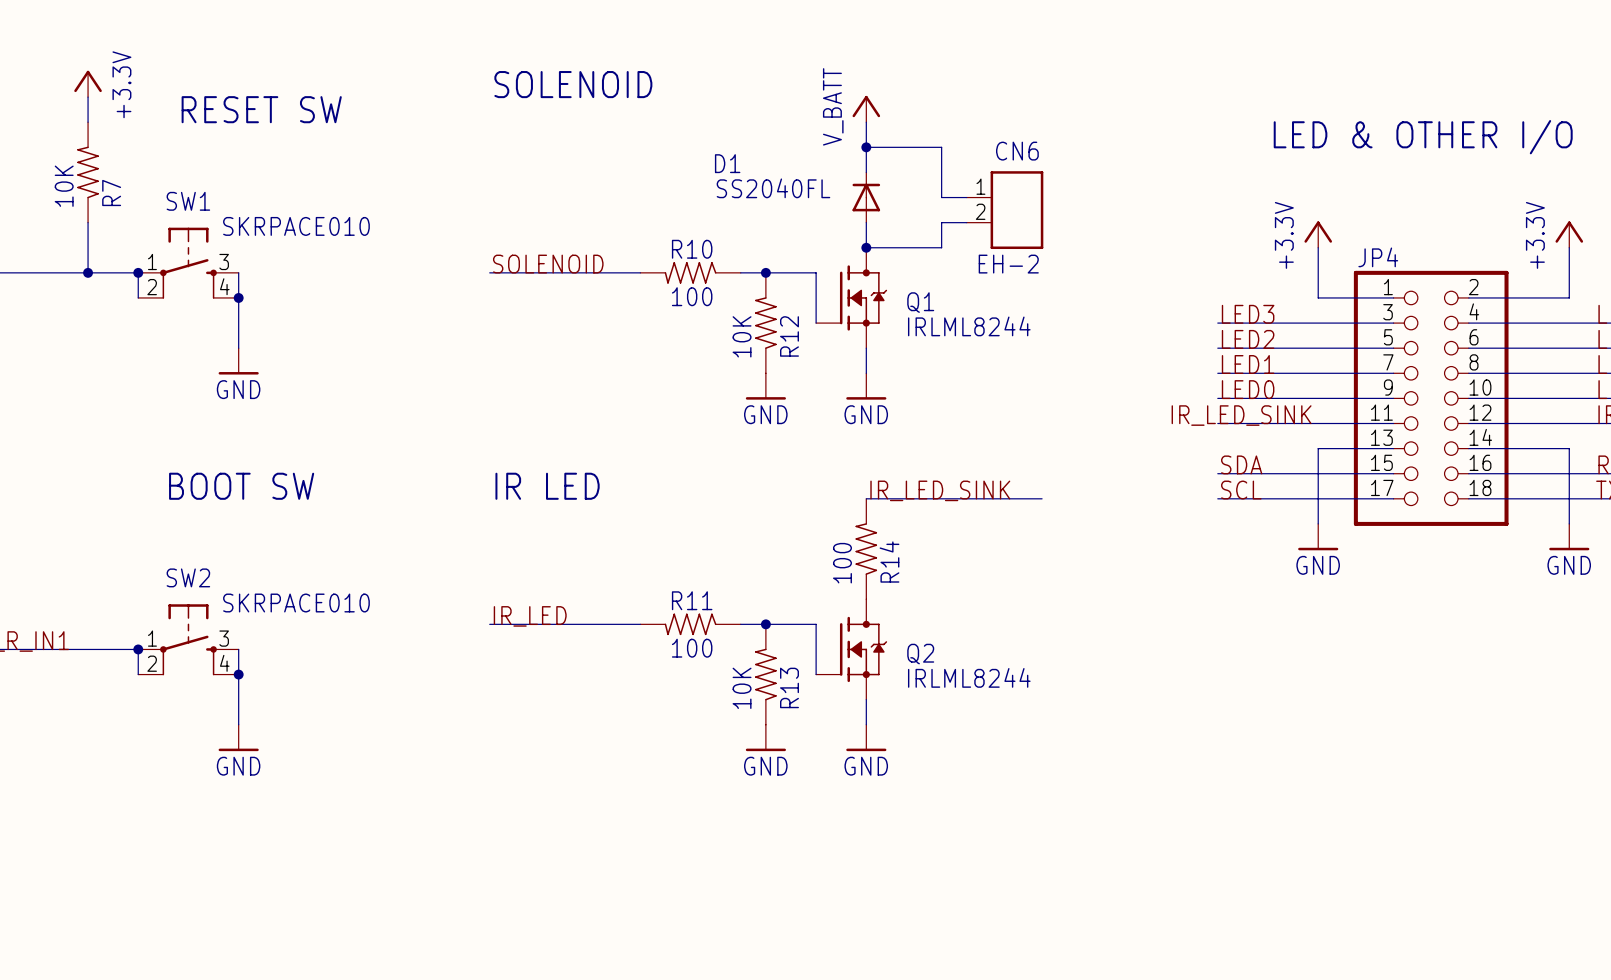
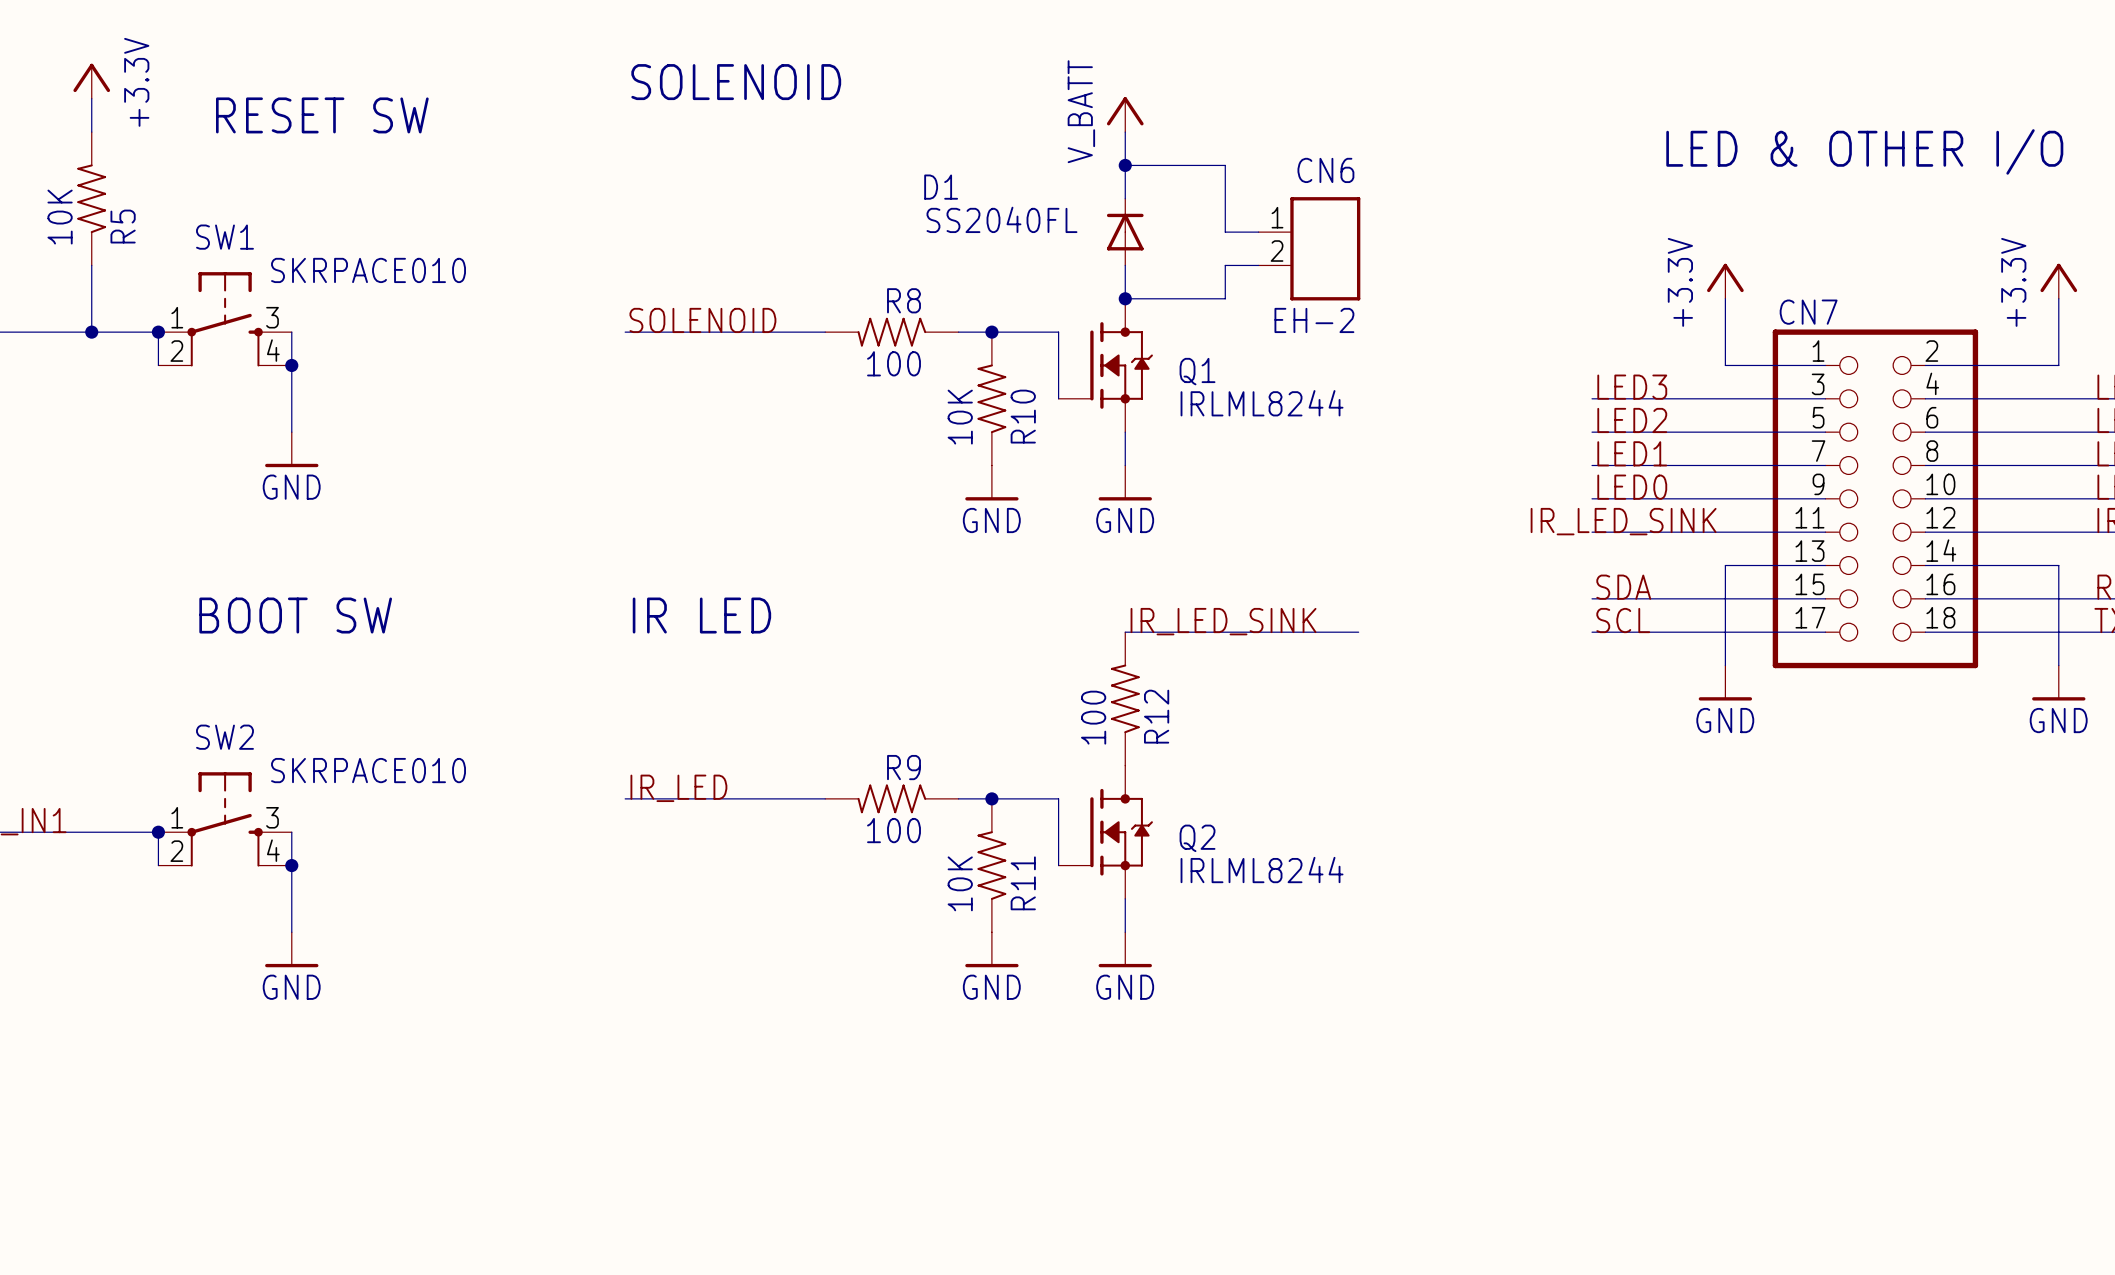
R7 name: R7 (111, 192) -> R5 (123, 226)
R10 name: R10 (692, 249) -> R8 (904, 300)
JP4 name: JP4 (1378, 257) -> CN7 (1808, 312)
R12 name: R12 (789, 336) -> R10 (1023, 416)
R14 name: R14 (889, 562) -> R12 (1156, 716)
R11 name: R11 (692, 600) -> R9 (904, 767)
R13 name: R13 (789, 687) -> R11 (1023, 883)

